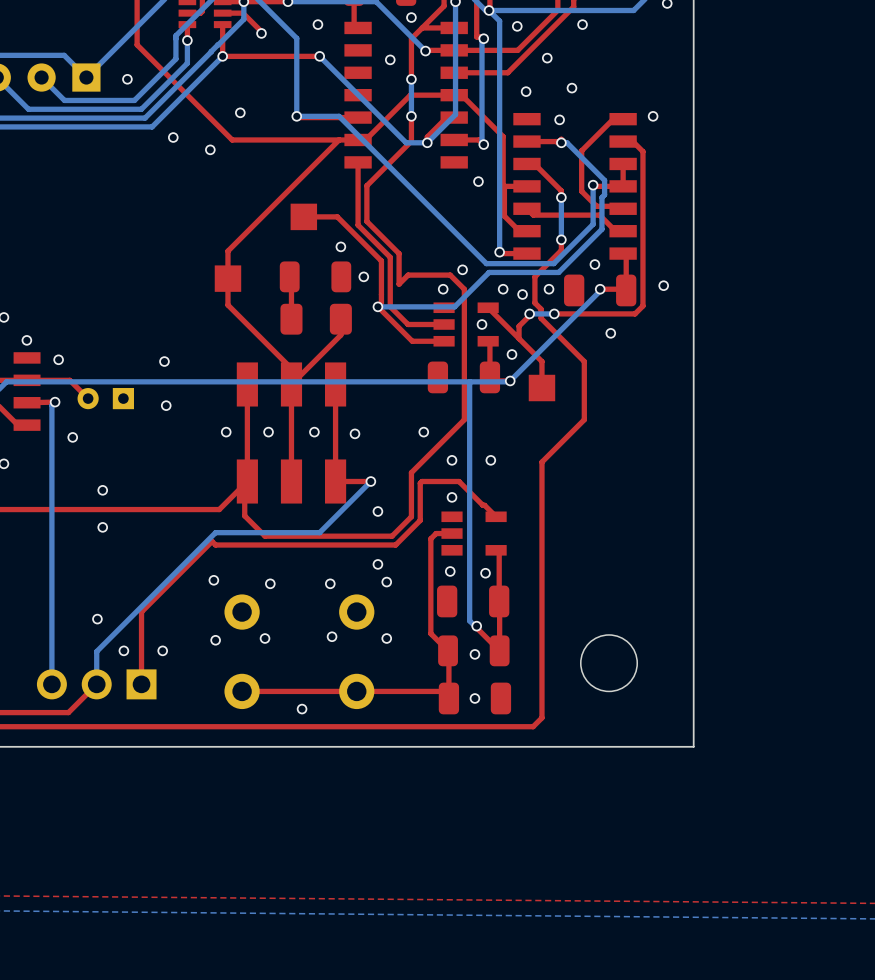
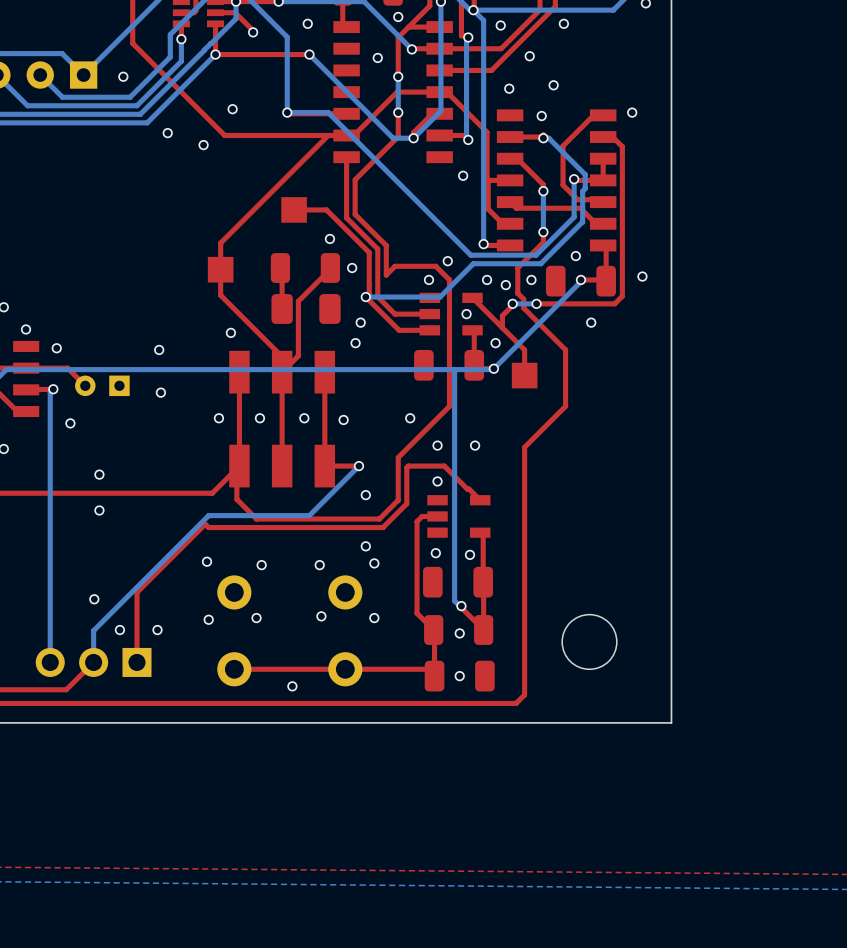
top track: (340, 319) (340, 335) (308, 367) -> (331, 268) (298, 301) (298, 355)
via: none -> (360, 322)
via: none -> (230, 332)
via: none -> (355, 343)

